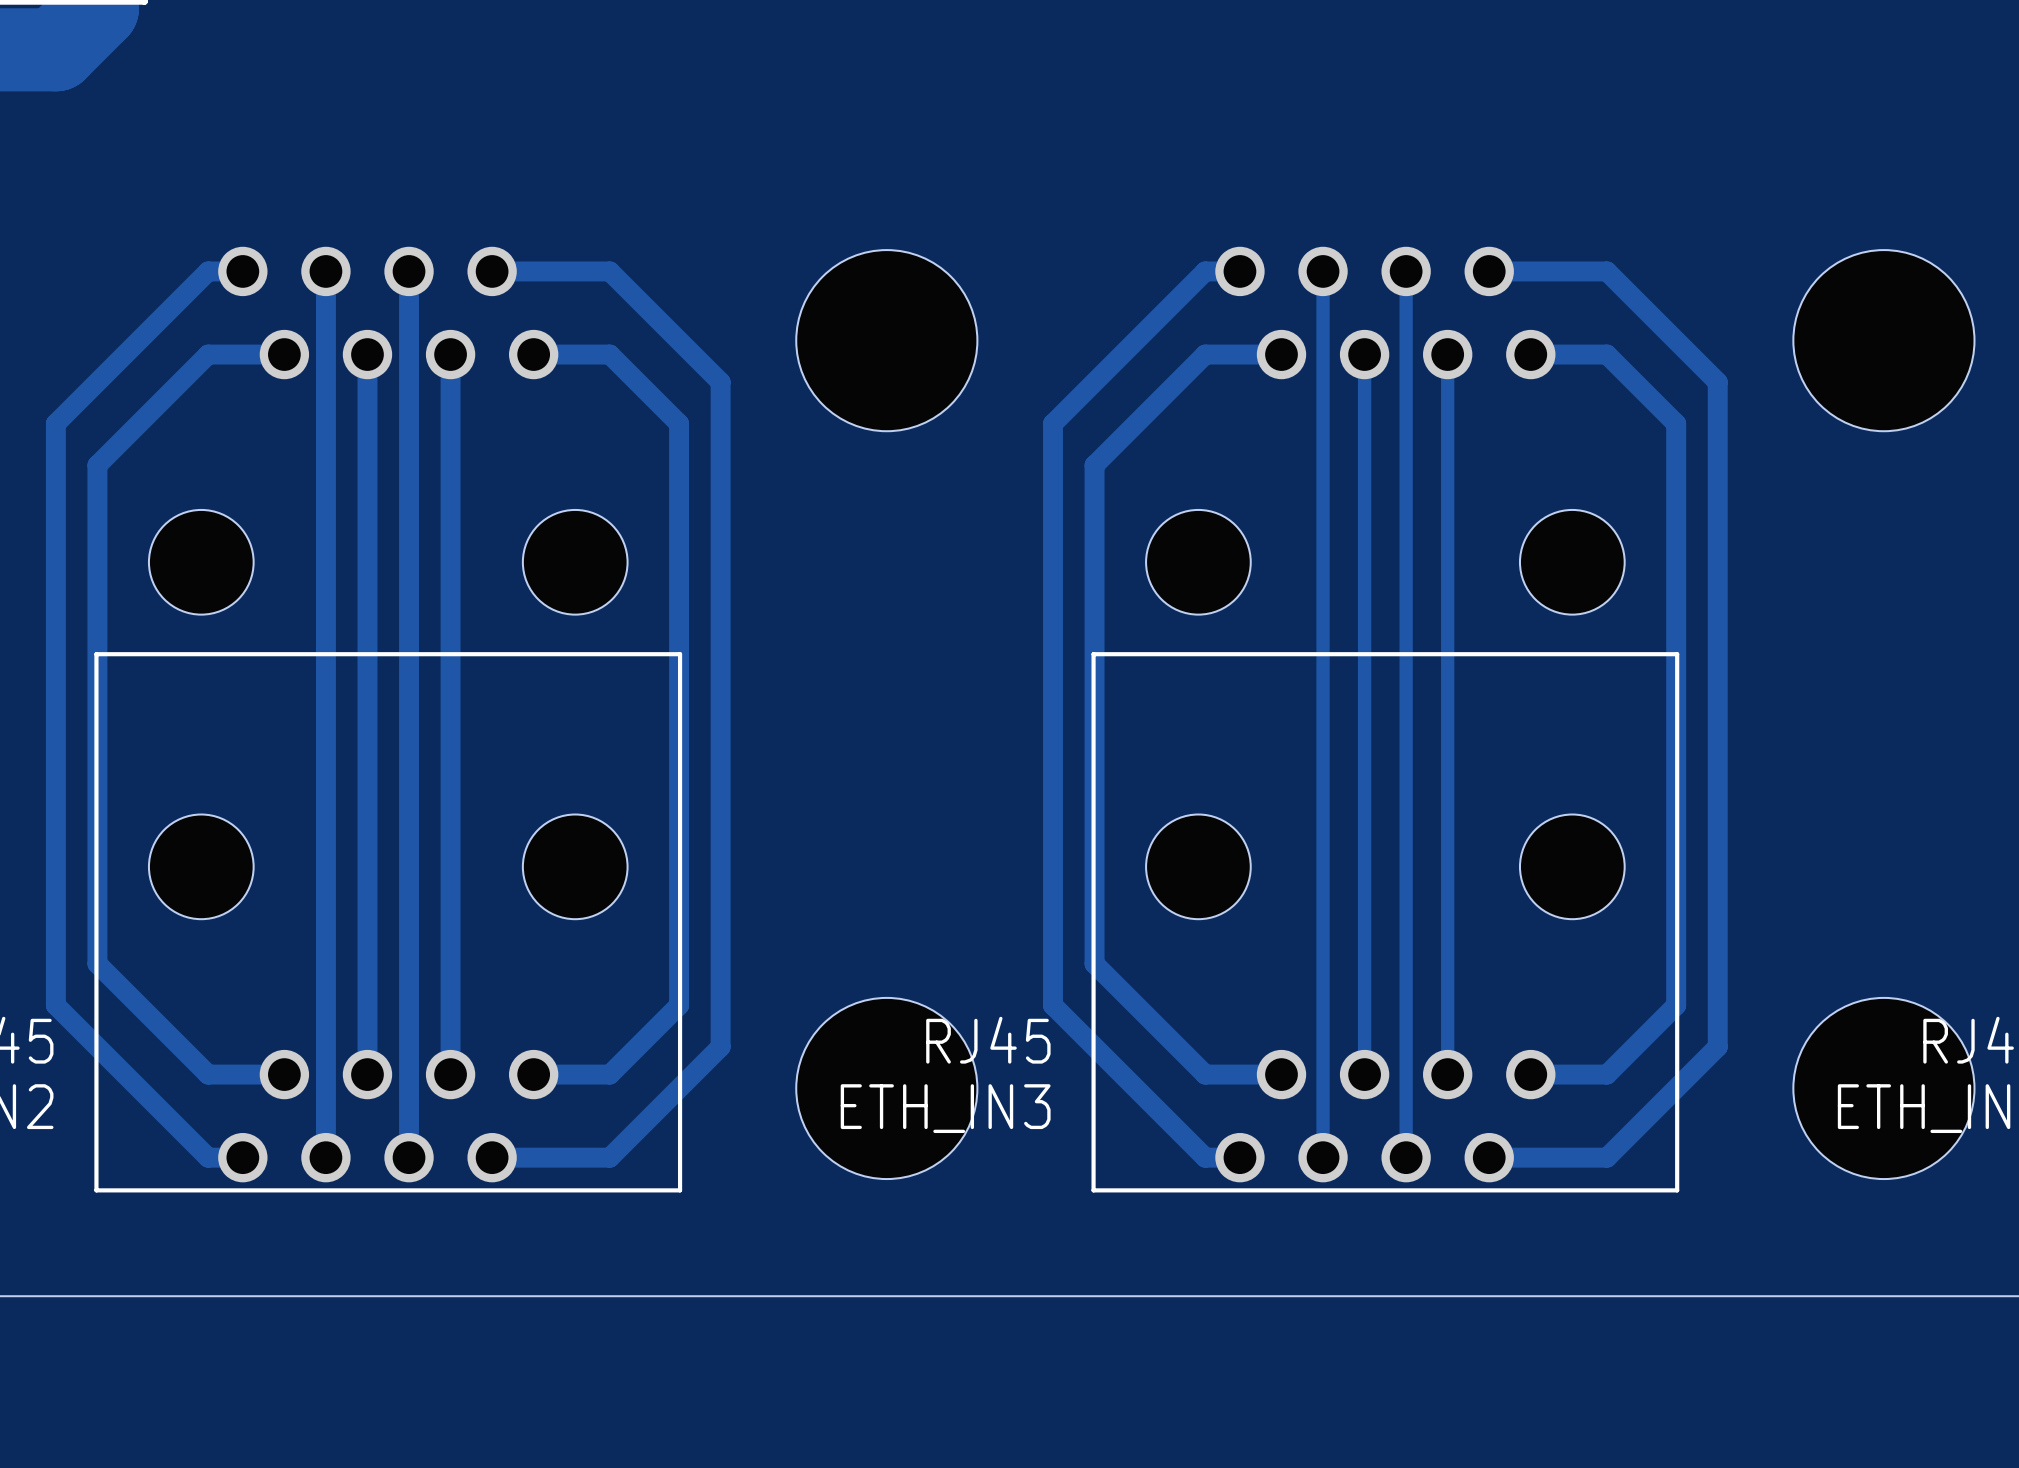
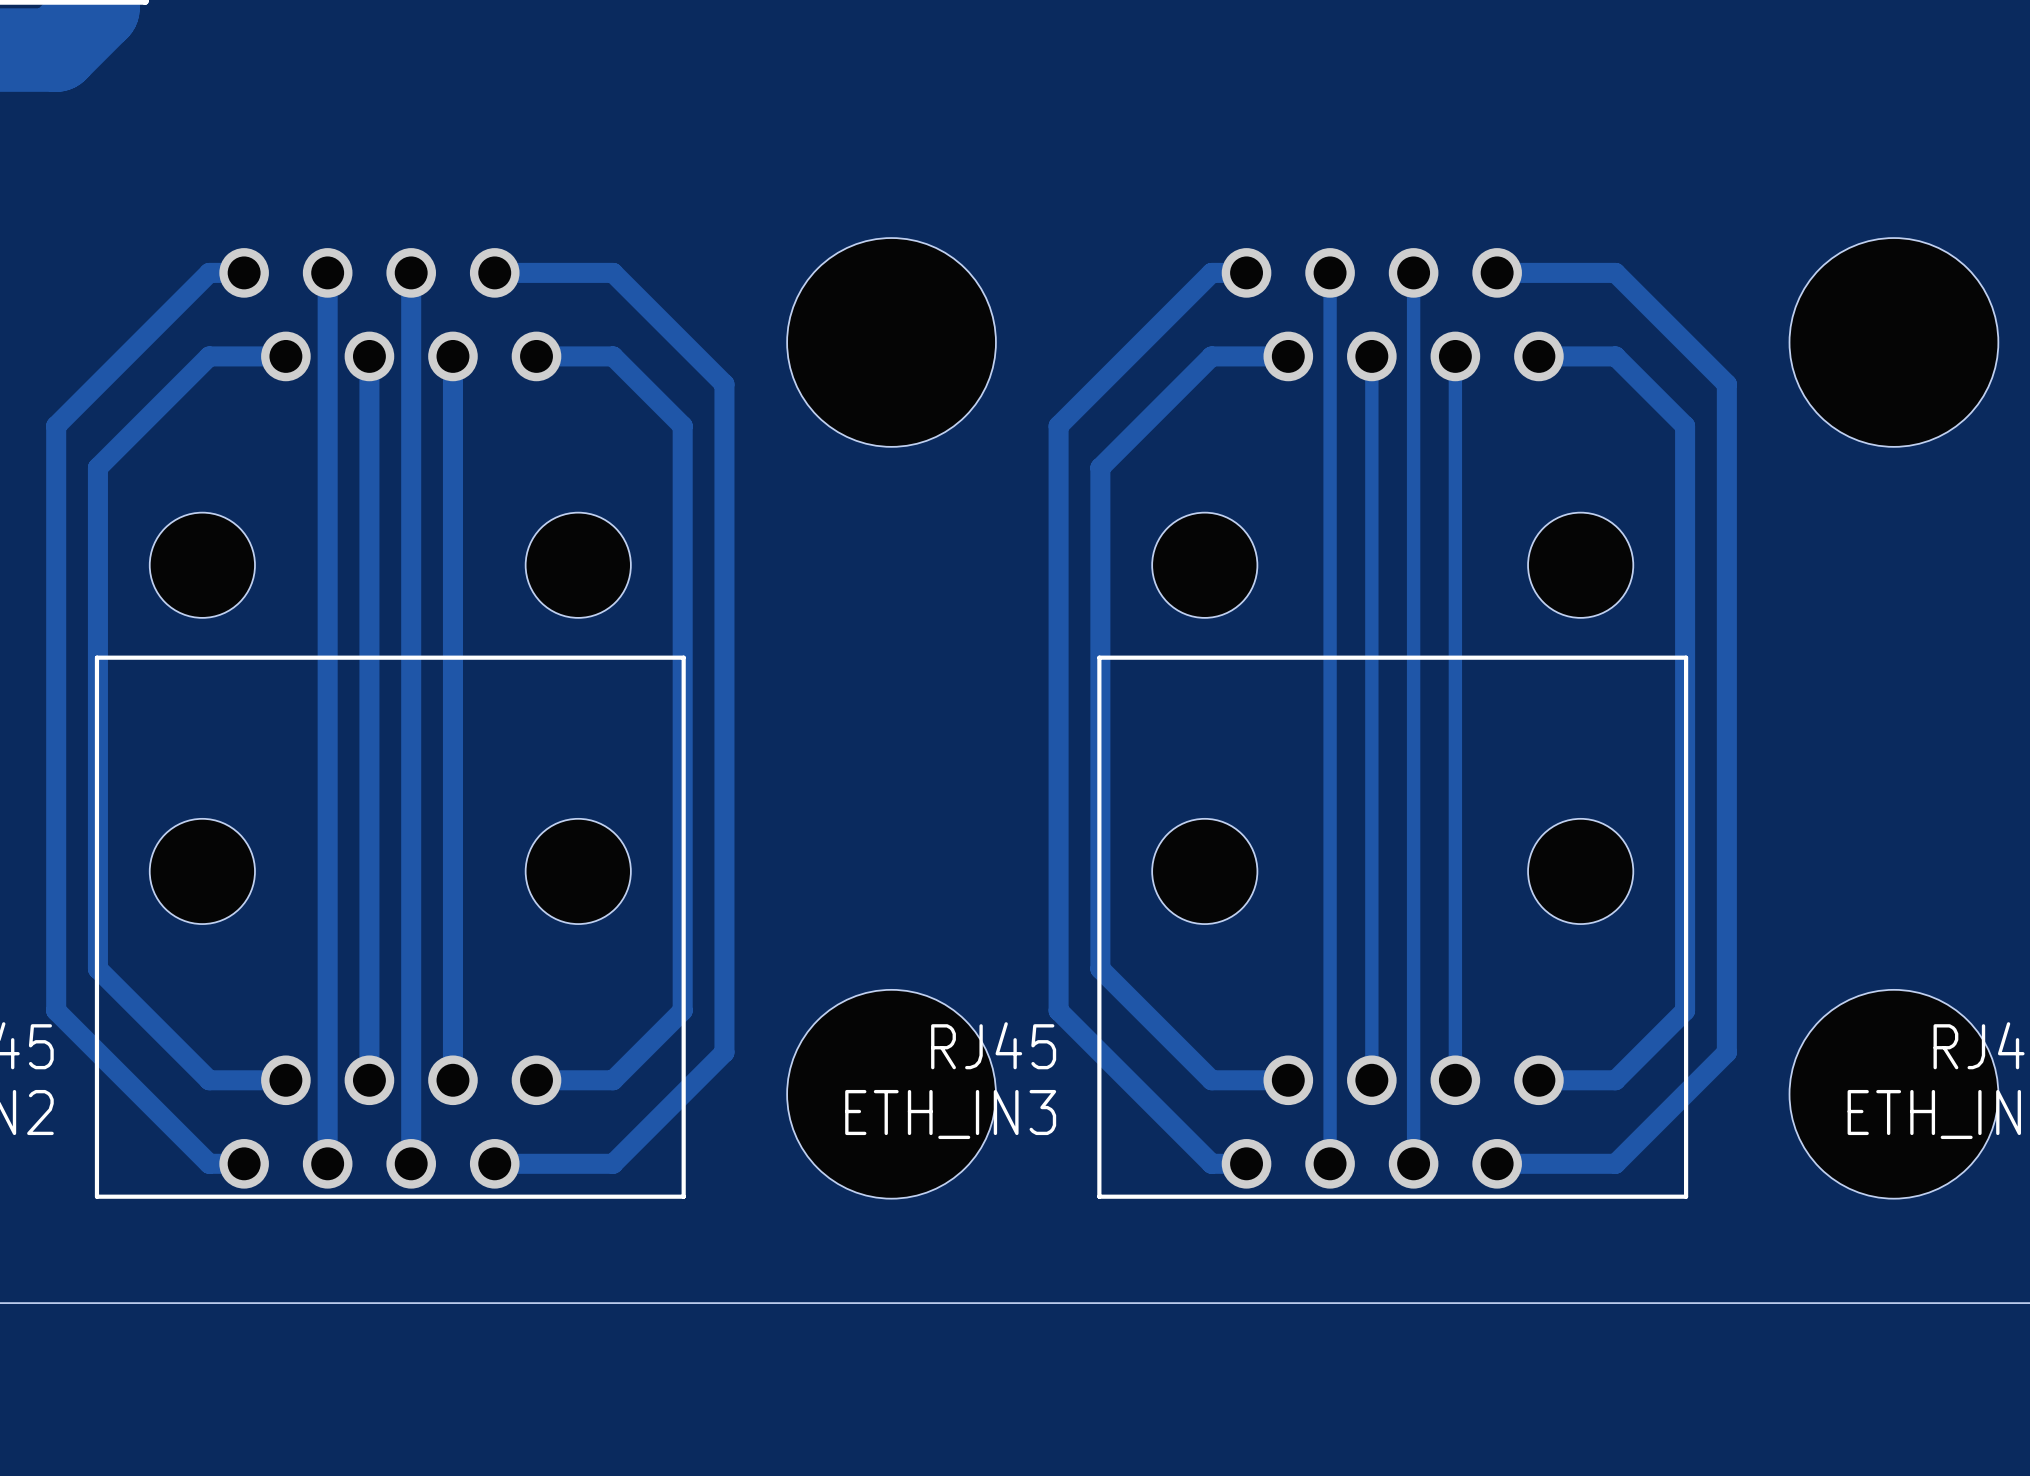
hole size: [796, 250, 978, 432] -> [787, 238, 996, 447]
hole size: [1793, 250, 1975, 432] -> [1789, 238, 1999, 447]
hole size: [796, 997, 978, 1180] -> [787, 989, 996, 1199]
hole size: [1793, 997, 1975, 1180] -> [1789, 989, 1999, 1199]

